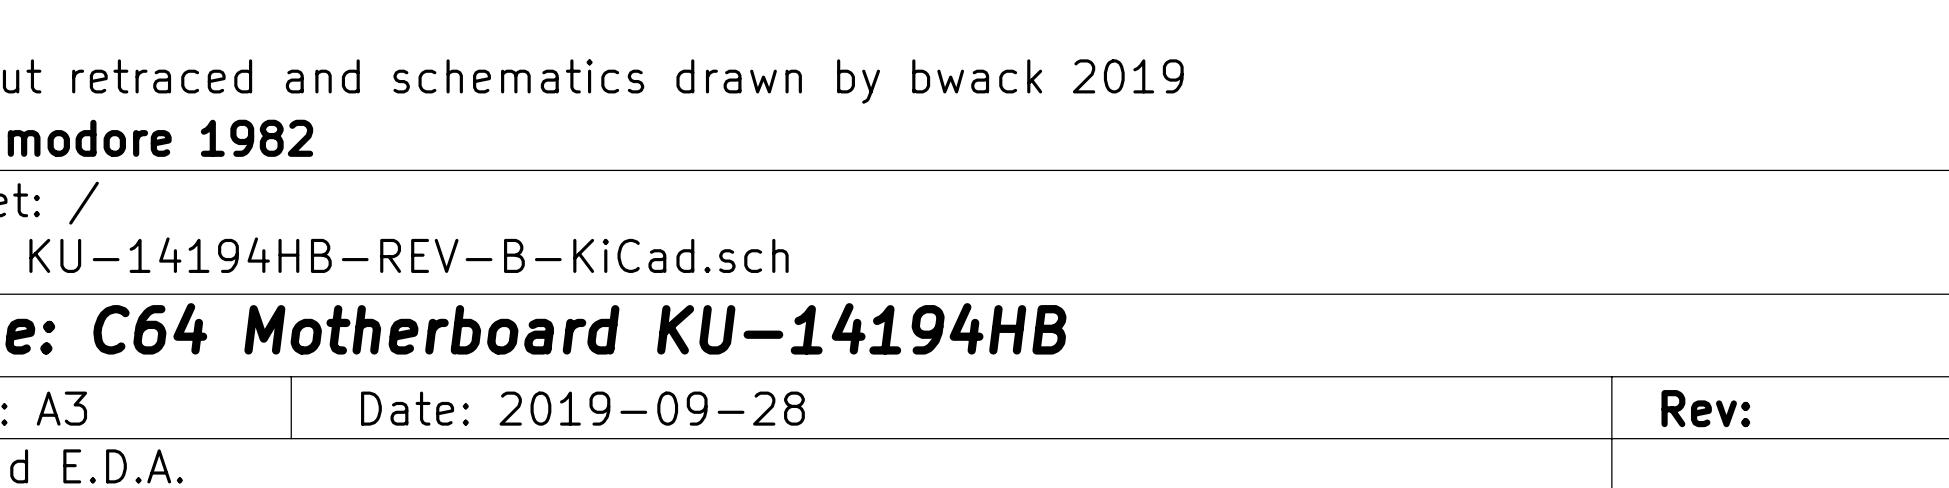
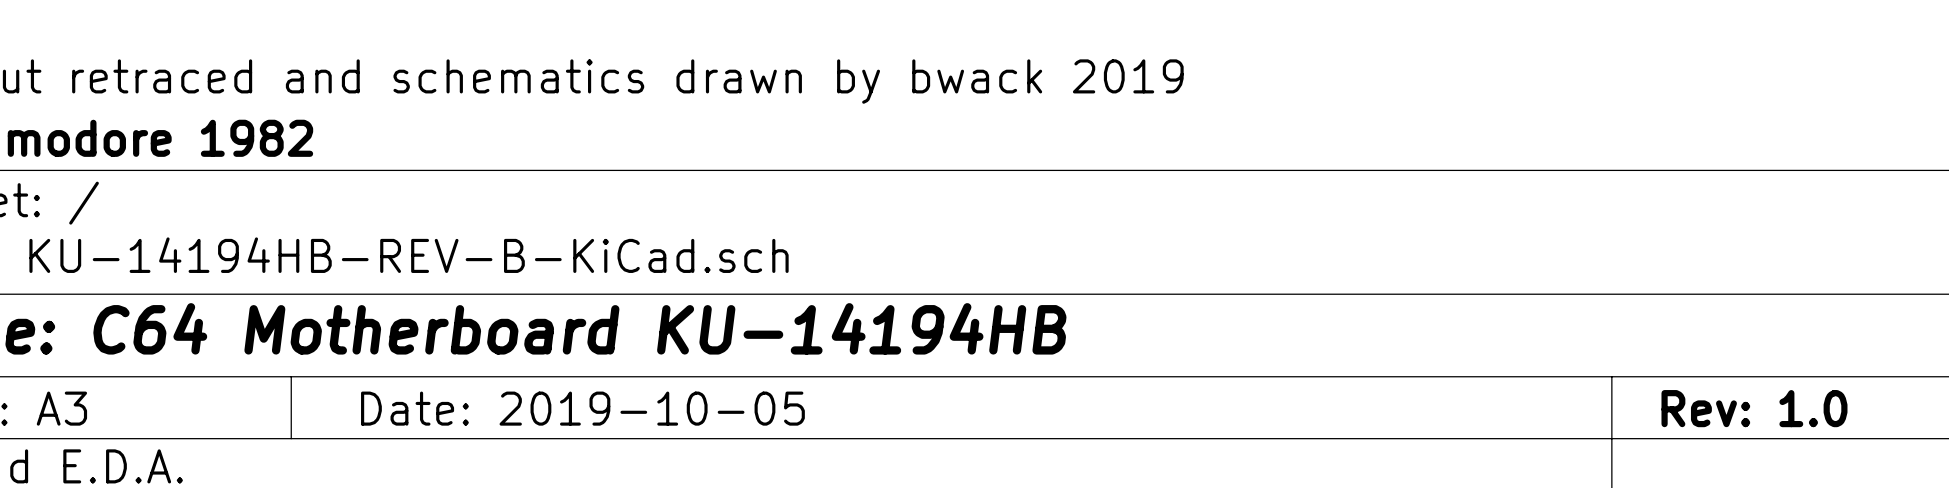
title block: Date: 2019-09-28 (582, 408) -> Date: 2019-10-05 (582, 408)
title block: Rev: (1705, 408) -> Rev: 1.0 (1754, 408)

